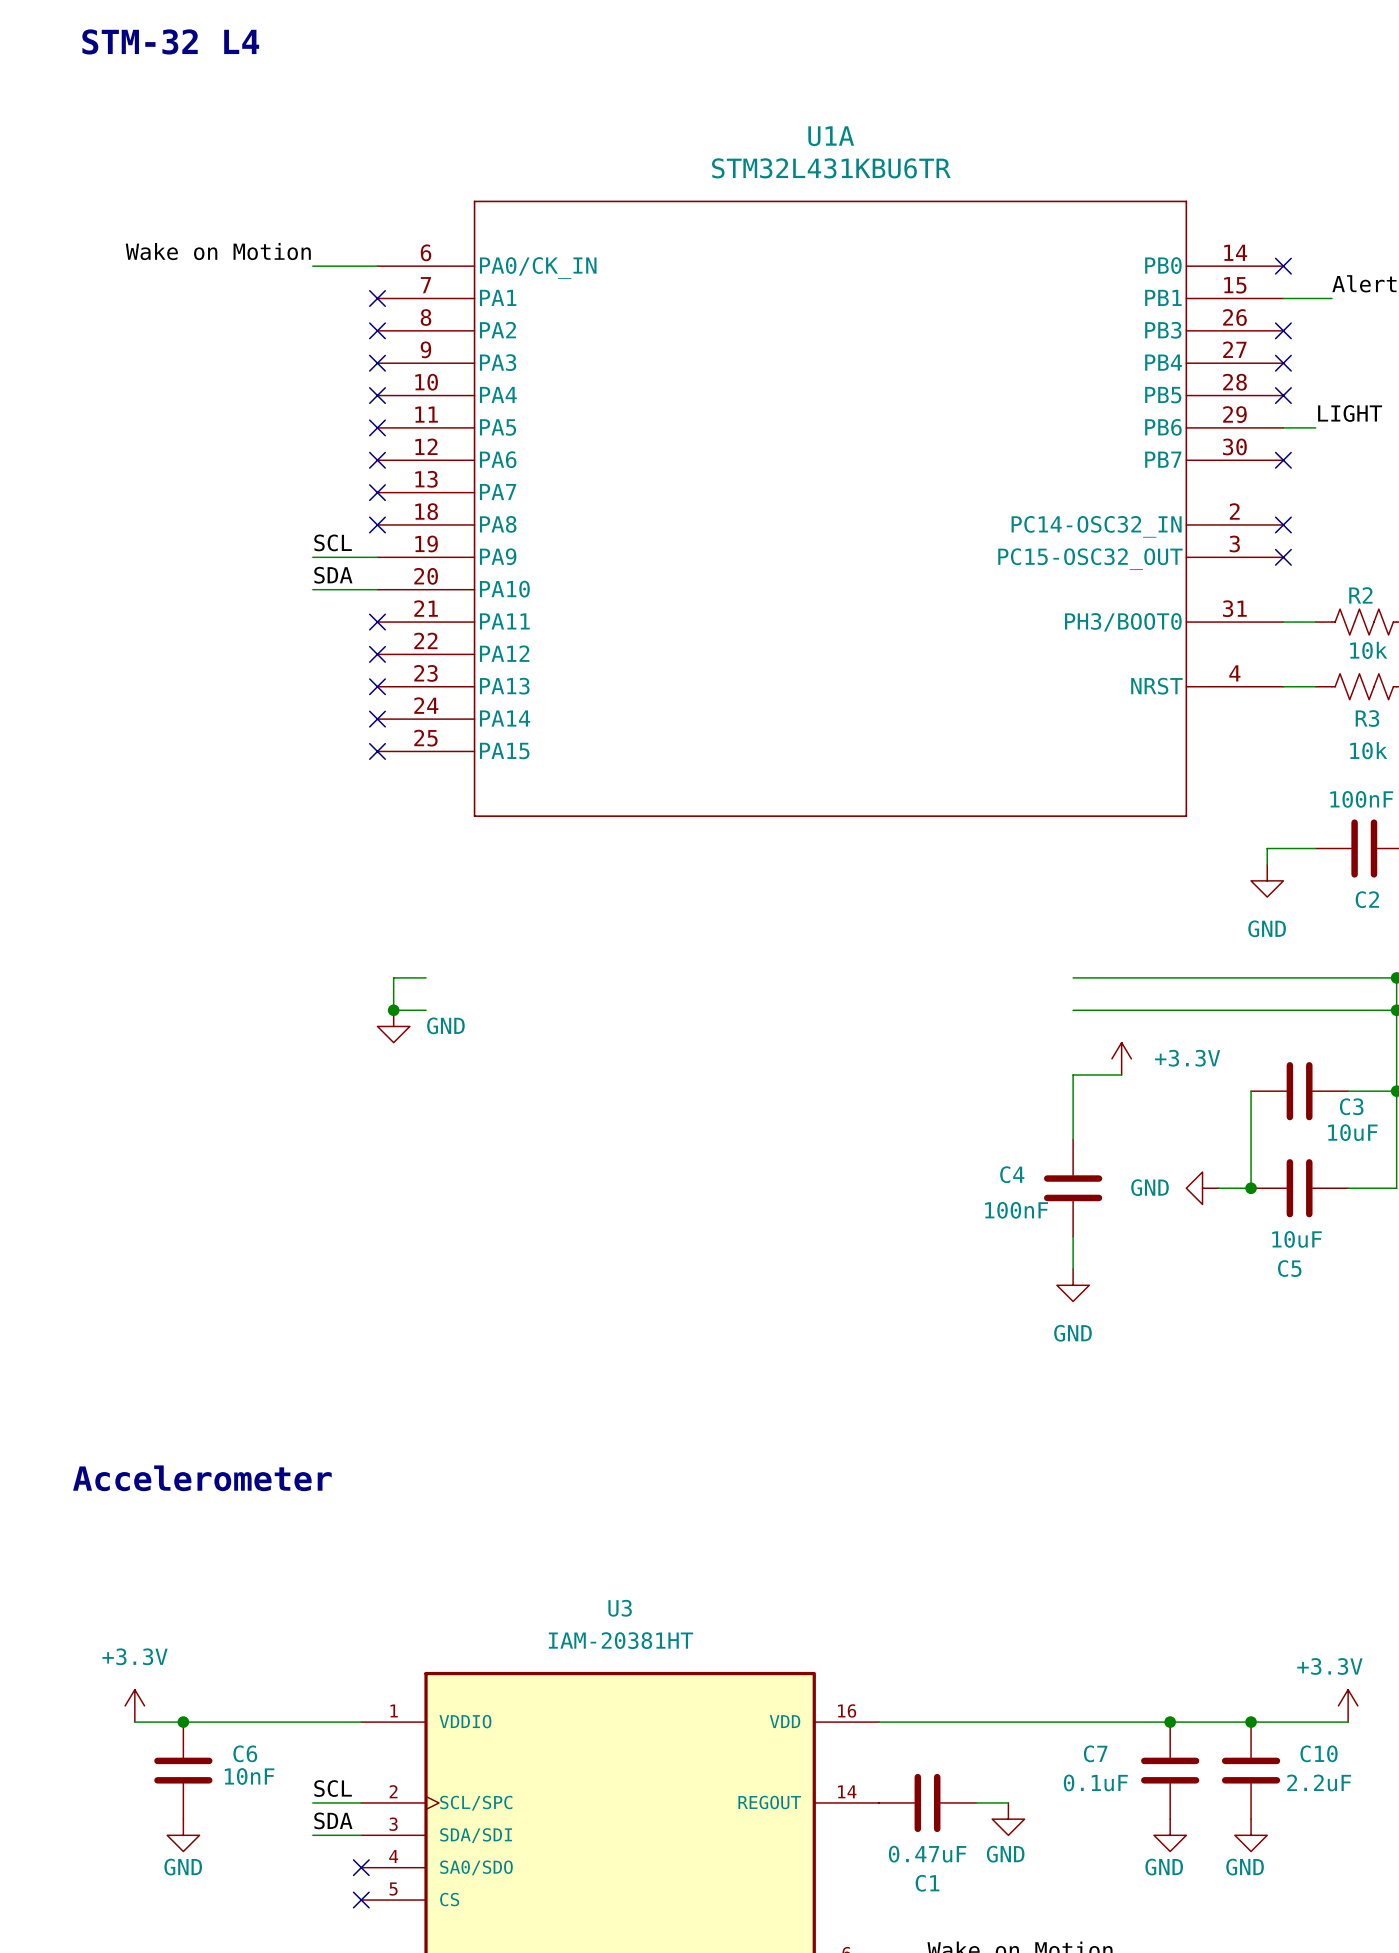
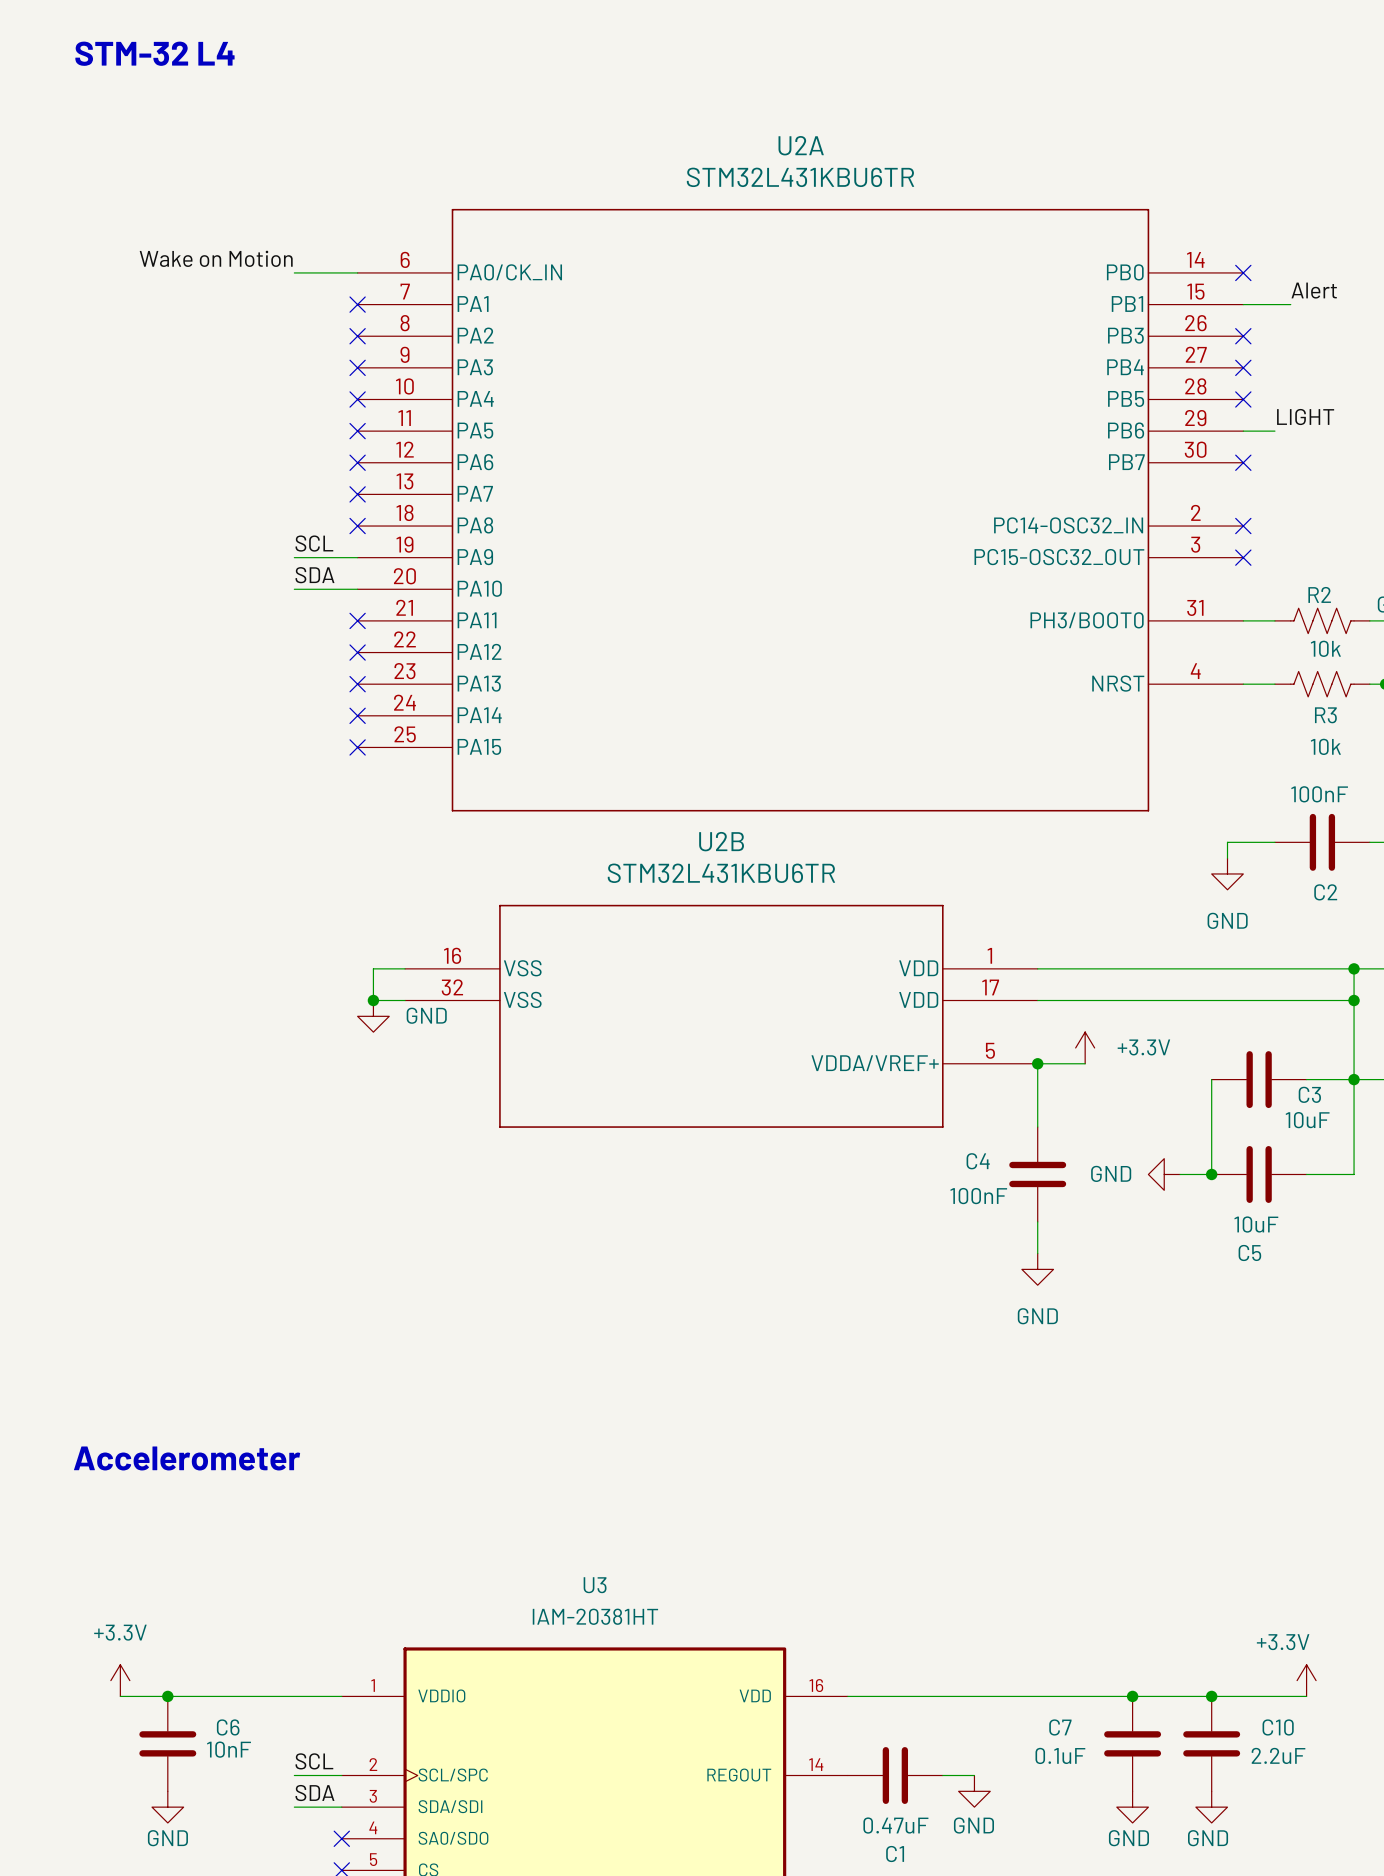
U1A name: U1A (831, 136) -> U2A (801, 145)
U2B: none -> STM32L431KBU6TR (721, 1016)
junction: none -> (1037, 1063)

